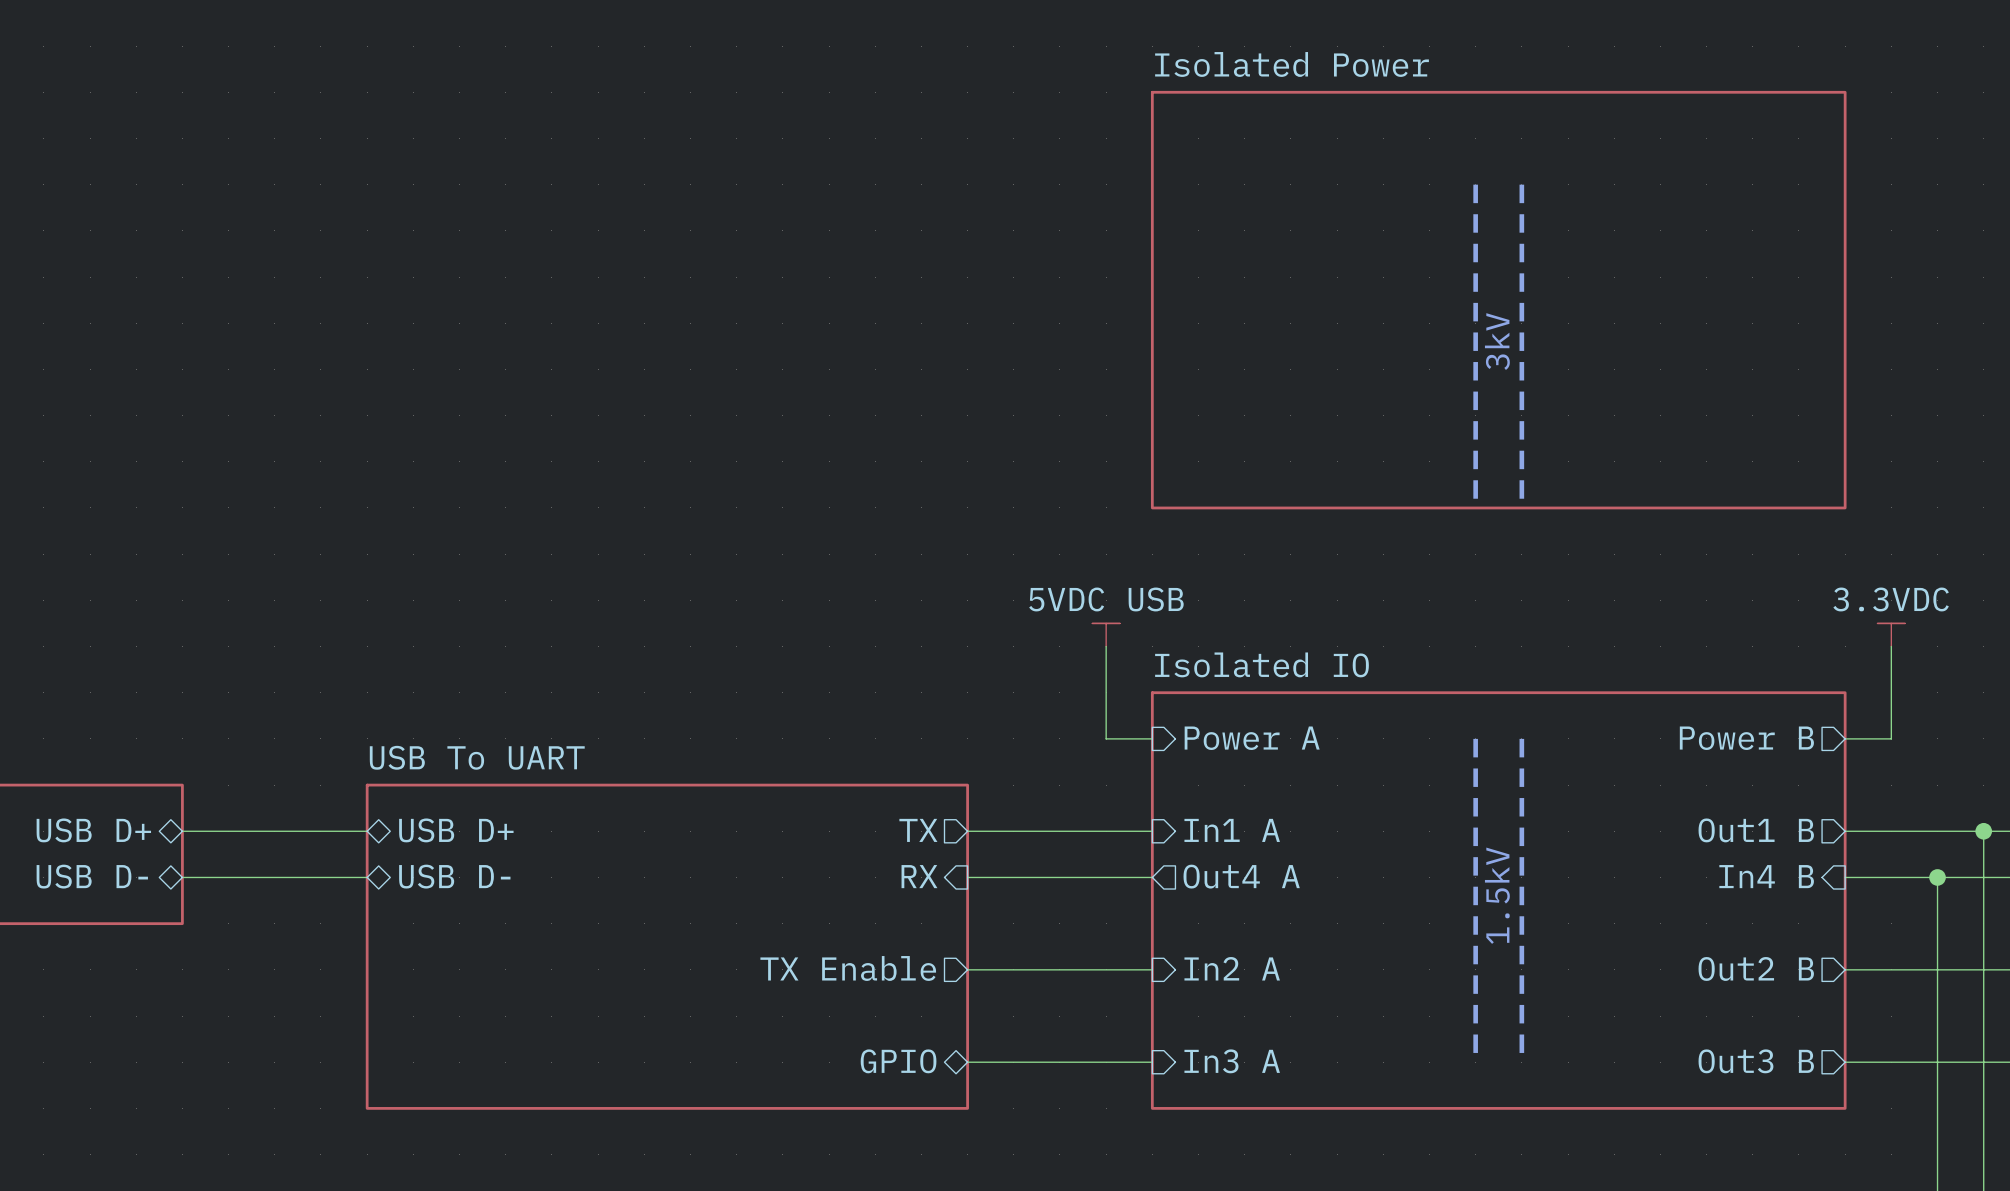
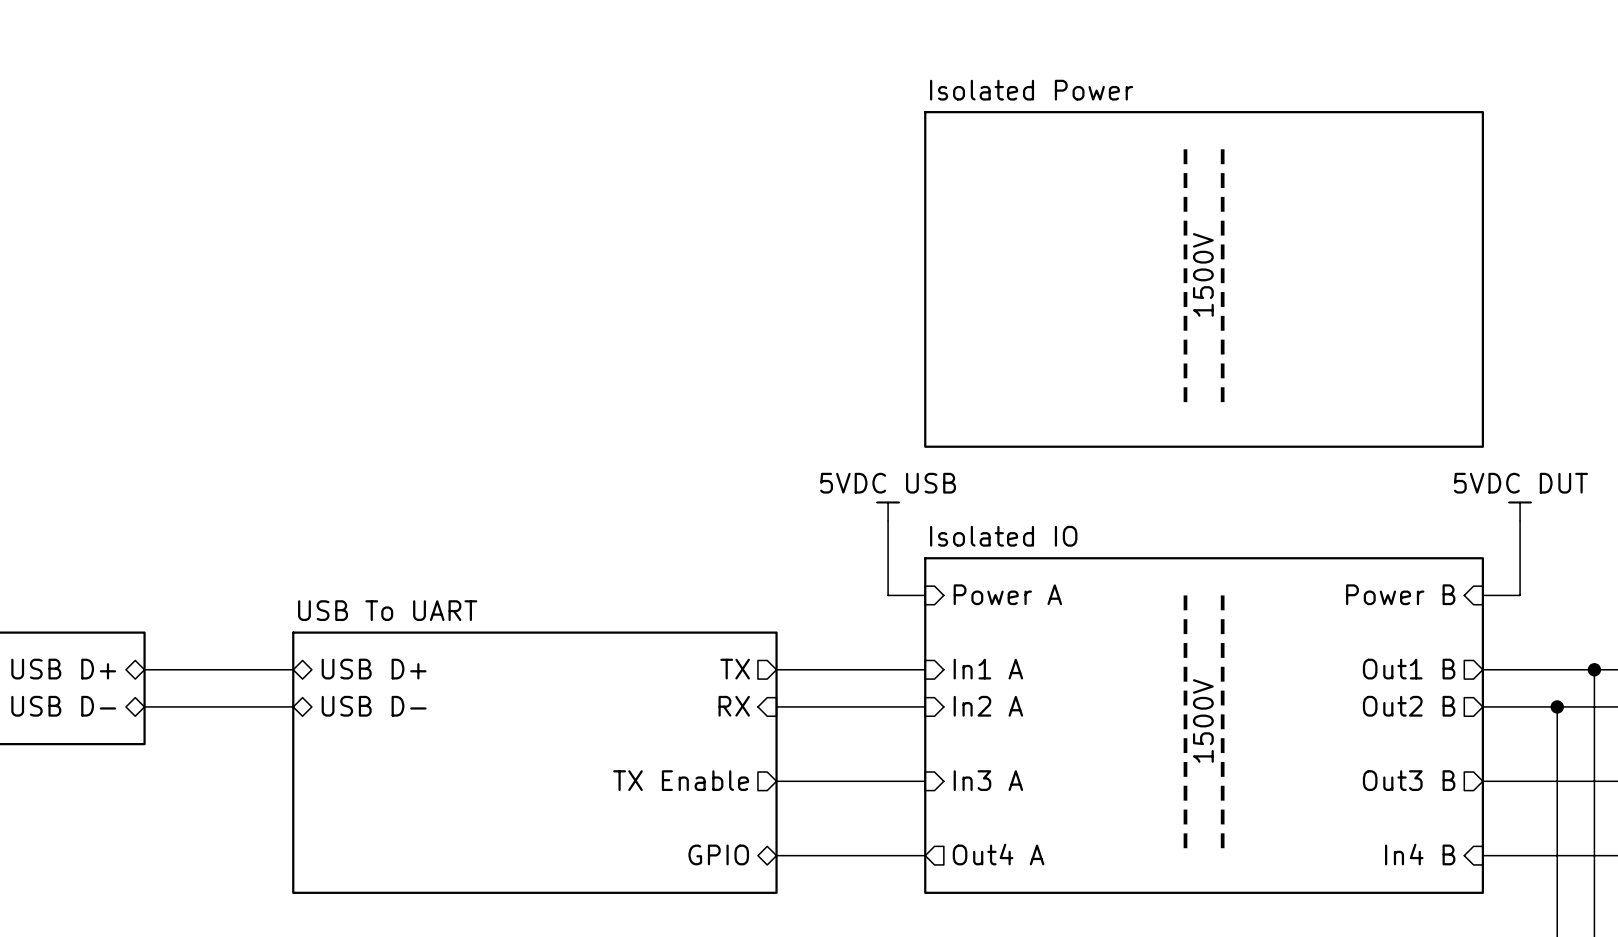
sheet Isolated Power position: (1498, 300) -> (1204, 279)
text: 3kV (1497, 341) -> 1500V (1203, 274)
power symbol: 3.3VDC (1891, 634) -> 5VDC DUT (1520, 511)
sheet pin shape: output (1746, 738) -> input (1400, 594)
sheet pin shape: output (1241, 876) -> input (988, 706)
sheet pin: Out4 A (1241, 876) -> In2 A (988, 706)
sheet pin shape: input (1766, 876) -> output (1409, 706)
sheet pin: In4 B (1766, 876) -> Out2 B (1409, 706)
text: 1.5kV (1497, 895) -> 1500V (1203, 720)
sheet pin: In2 A (1232, 968) -> In3 A (988, 780)
sheet pin: Out2 B (1756, 968) -> Out3 B (1409, 780)
sheet pin shape: input (1232, 1061) -> output (998, 854)
sheet pin: In3 A (1232, 1061) -> Out4 A (998, 854)
sheet pin shape: output (1756, 1061) -> input (1420, 854)
sheet pin: Out3 B (1756, 1061) -> In4 B (1420, 854)

